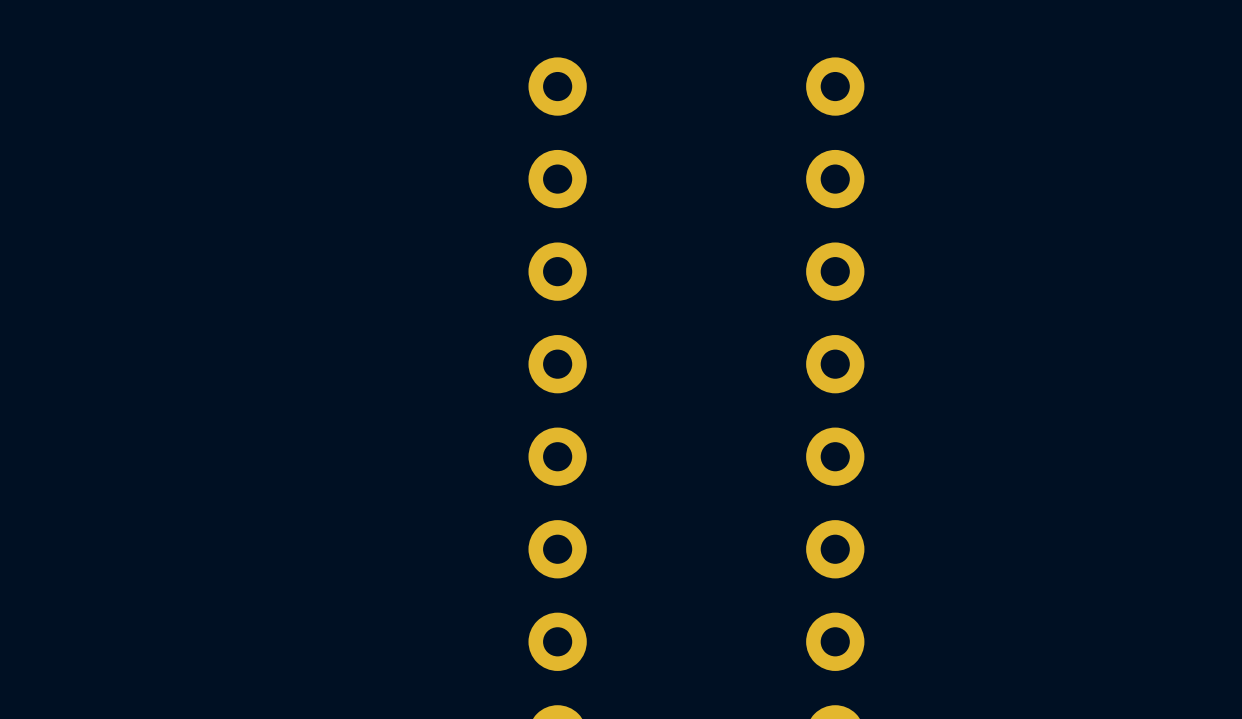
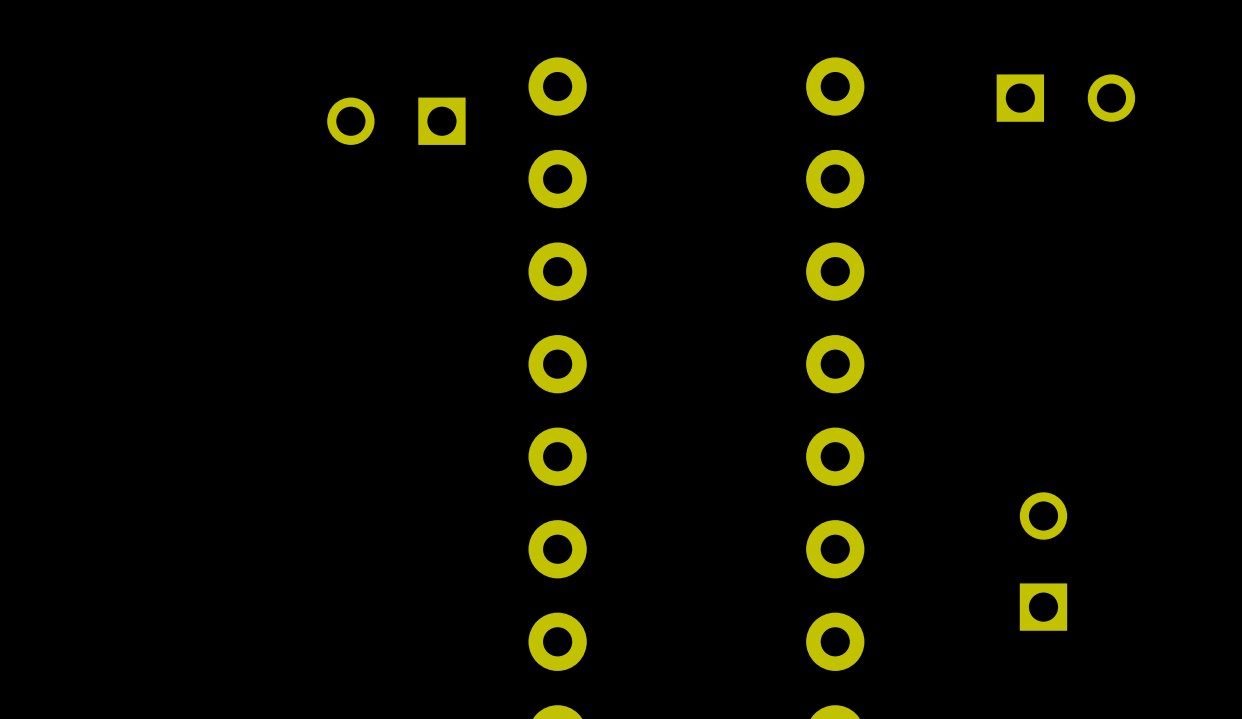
part: none -> (1065, 98)
part: none -> (396, 121)
part: none -> (1043, 561)

